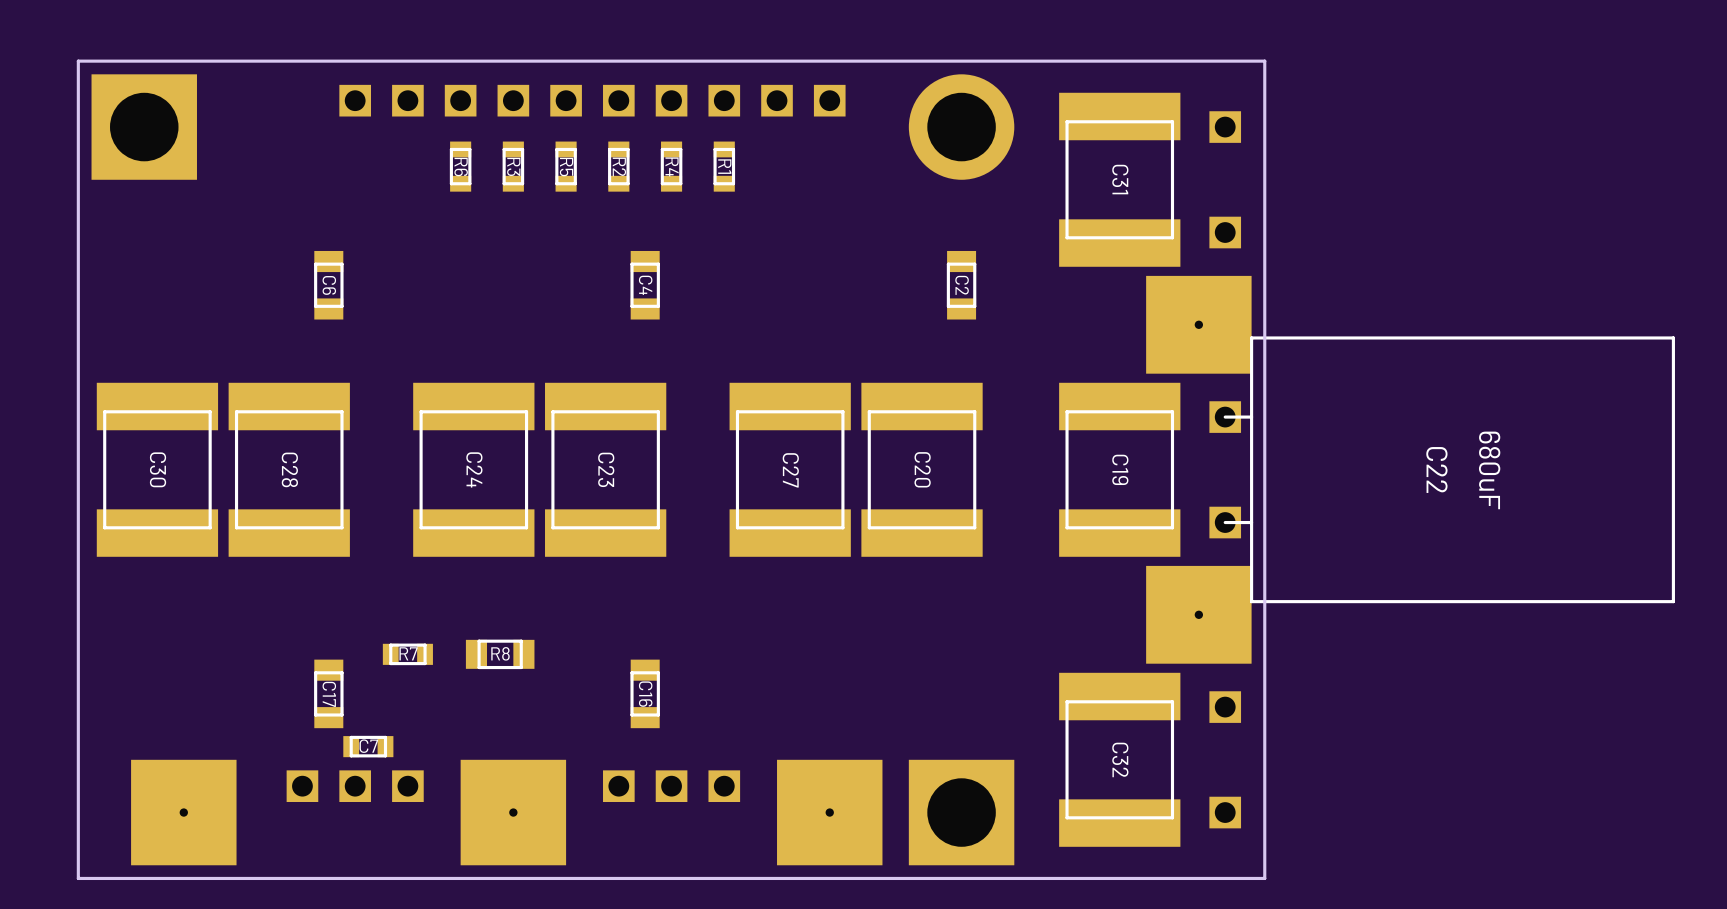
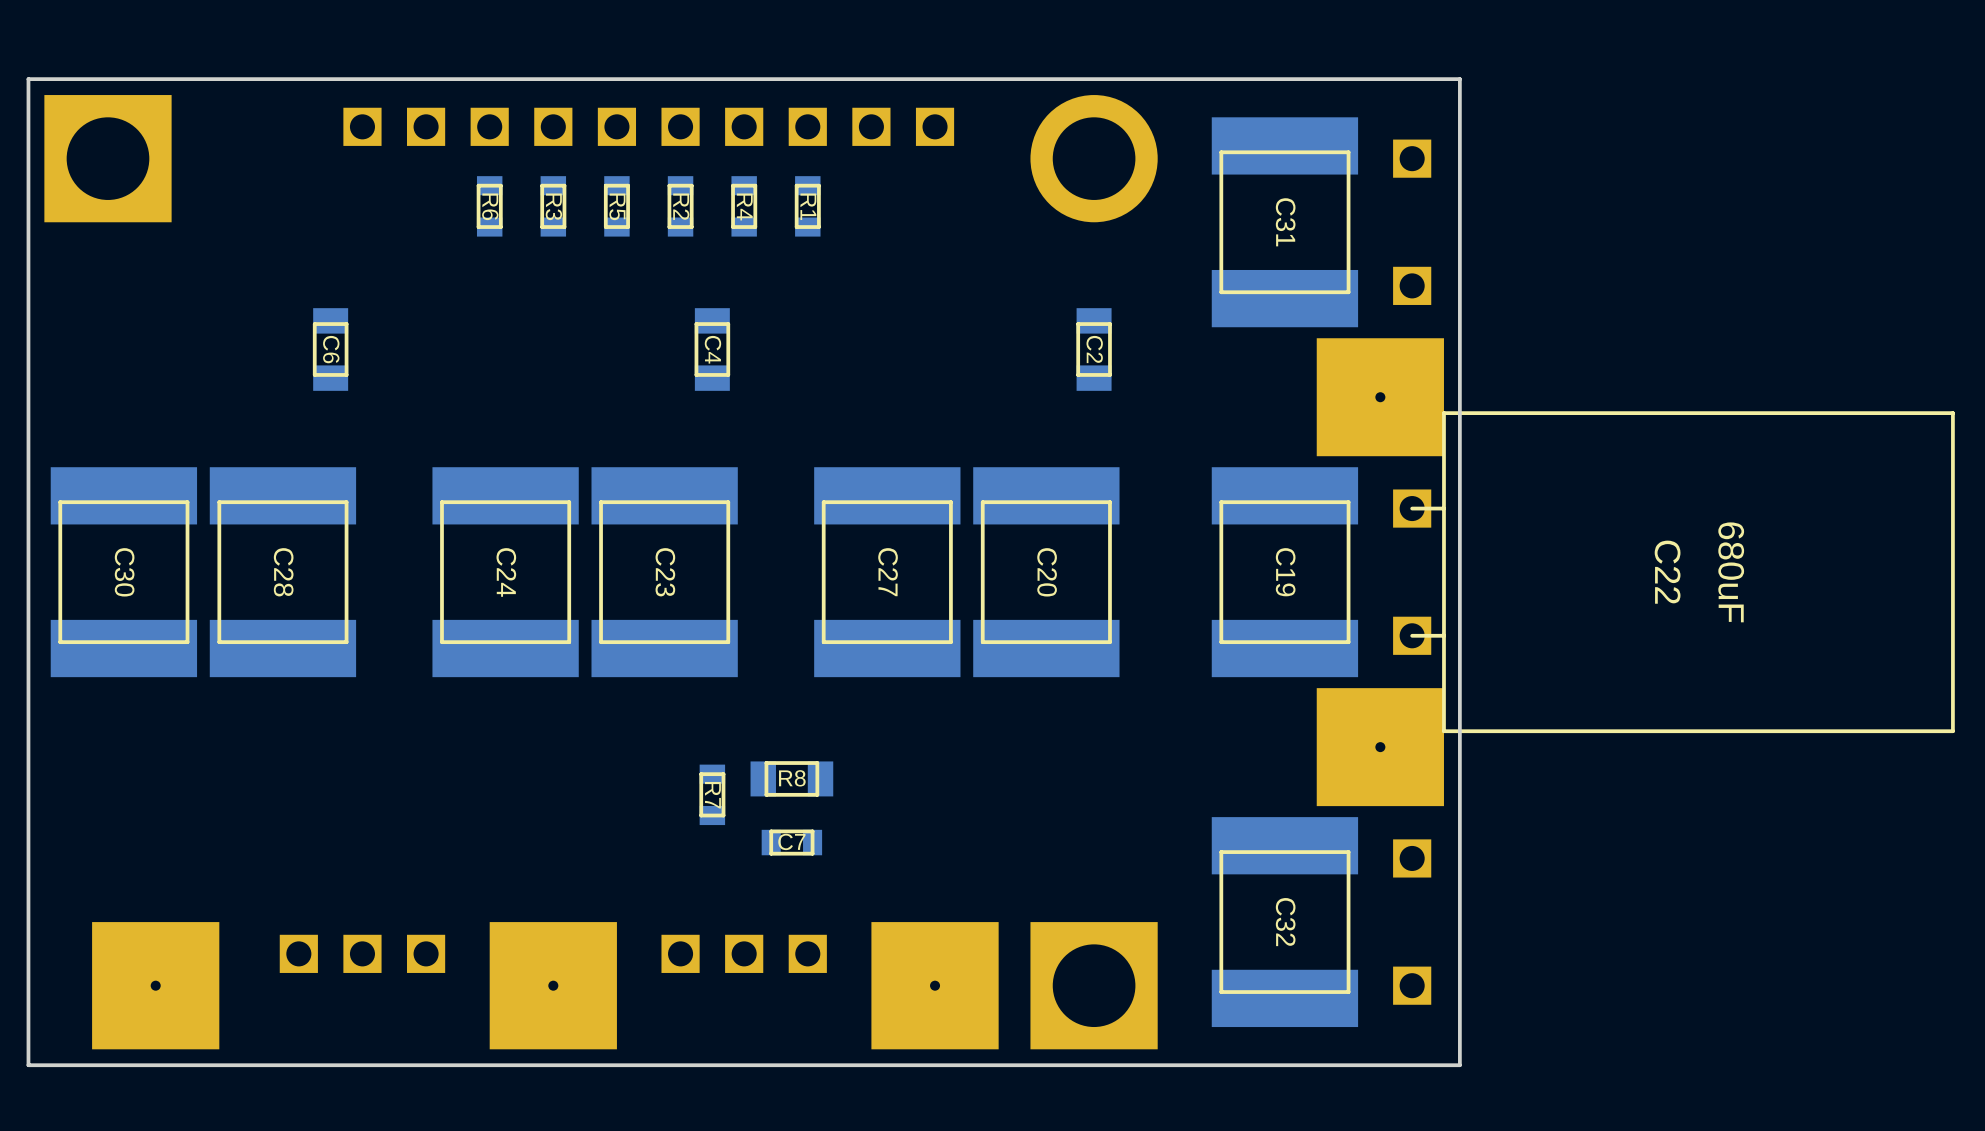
R7 rotation: 0° (407, 654) -> 90° clockwise (712, 794)
R7 position: (407, 654) -> (712, 794)
R8 position: (500, 654) -> (791, 778)
C17: (328, 693) -> none
C16: (645, 693) -> none
C7 position: (368, 746) -> (791, 842)

